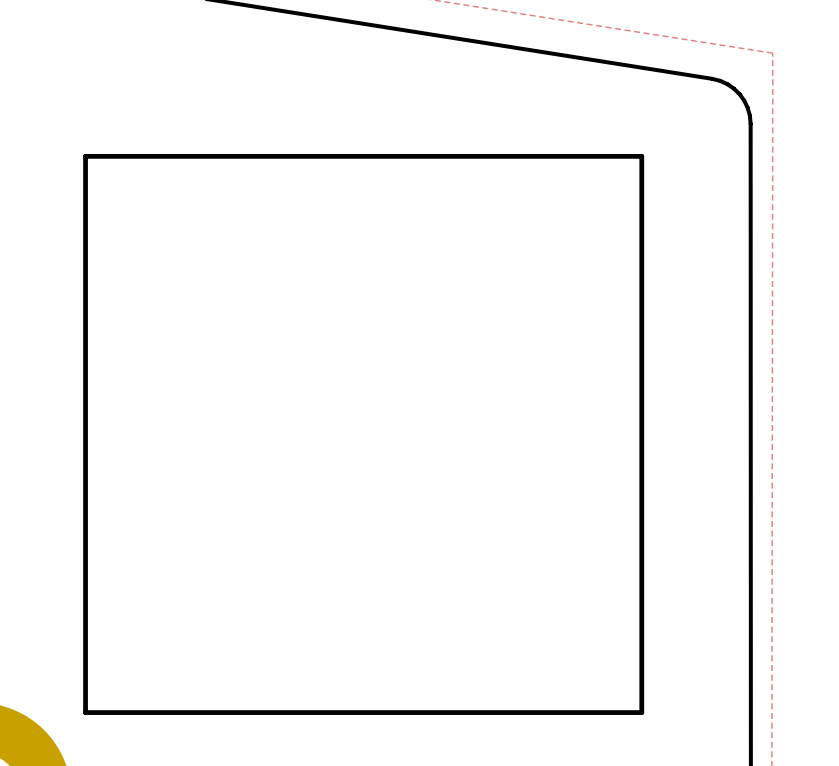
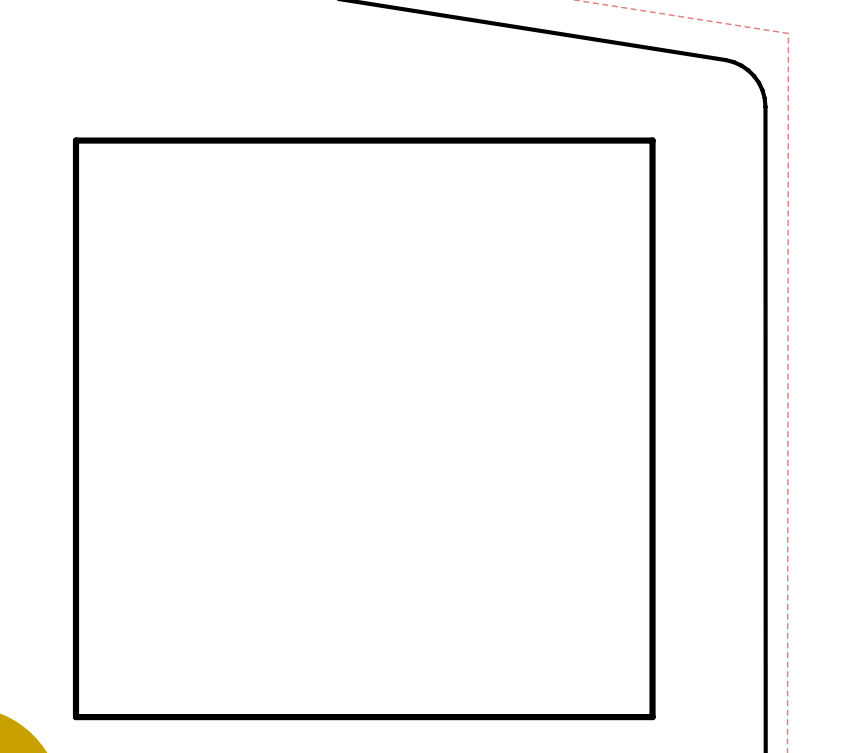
drawing: [83, 153, 645, 715] -> none
board edge: none -> (76, 140) (652, 140) (652, 717) (76, 717) (76, 140)

